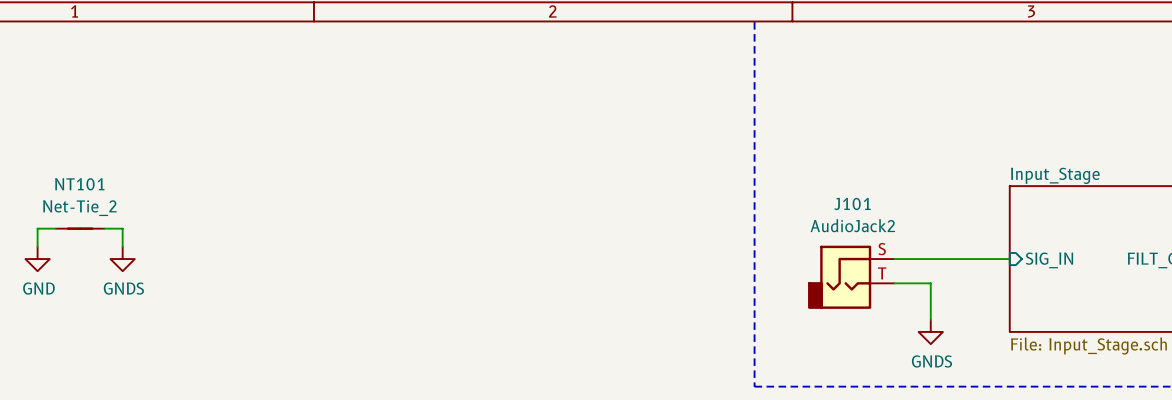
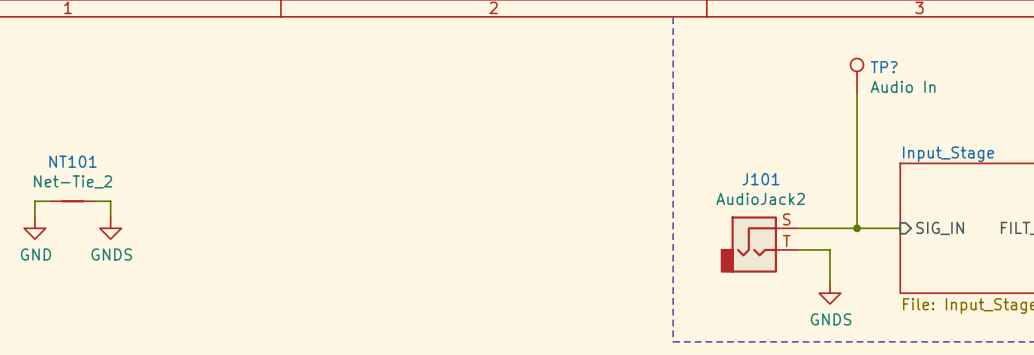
TP?: none -> Audio In (857, 75)
wire: none -> (857, 93) (857, 228)
junction: none -> (857, 228)

